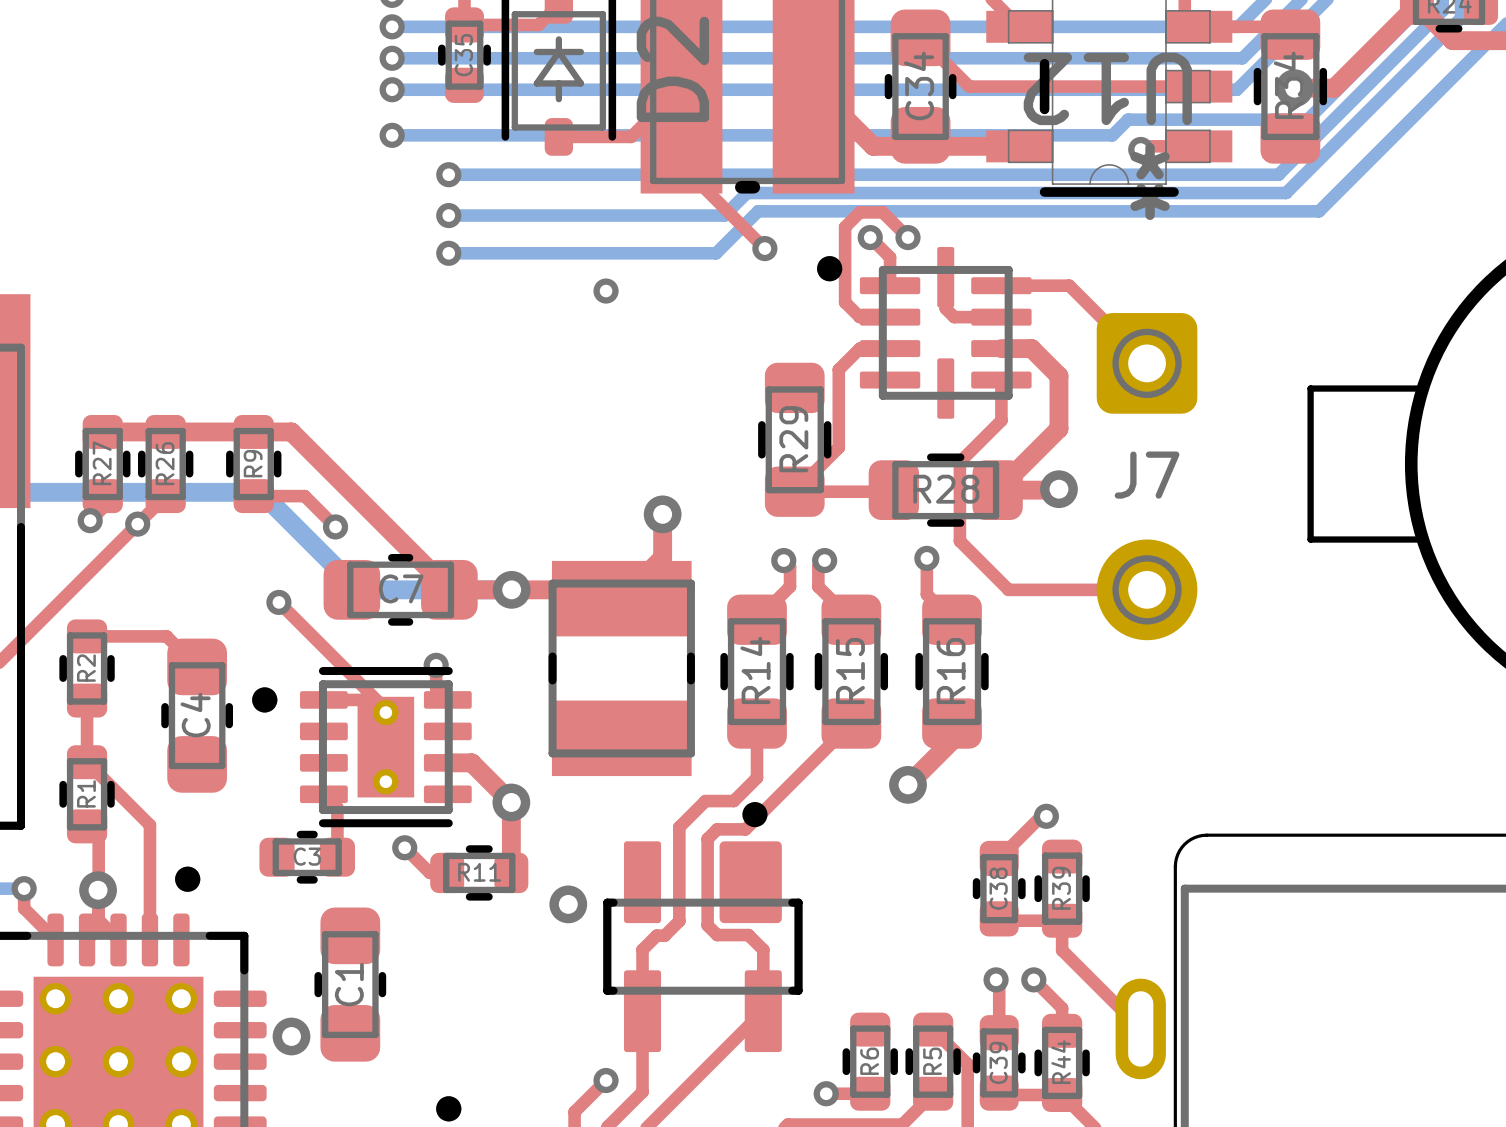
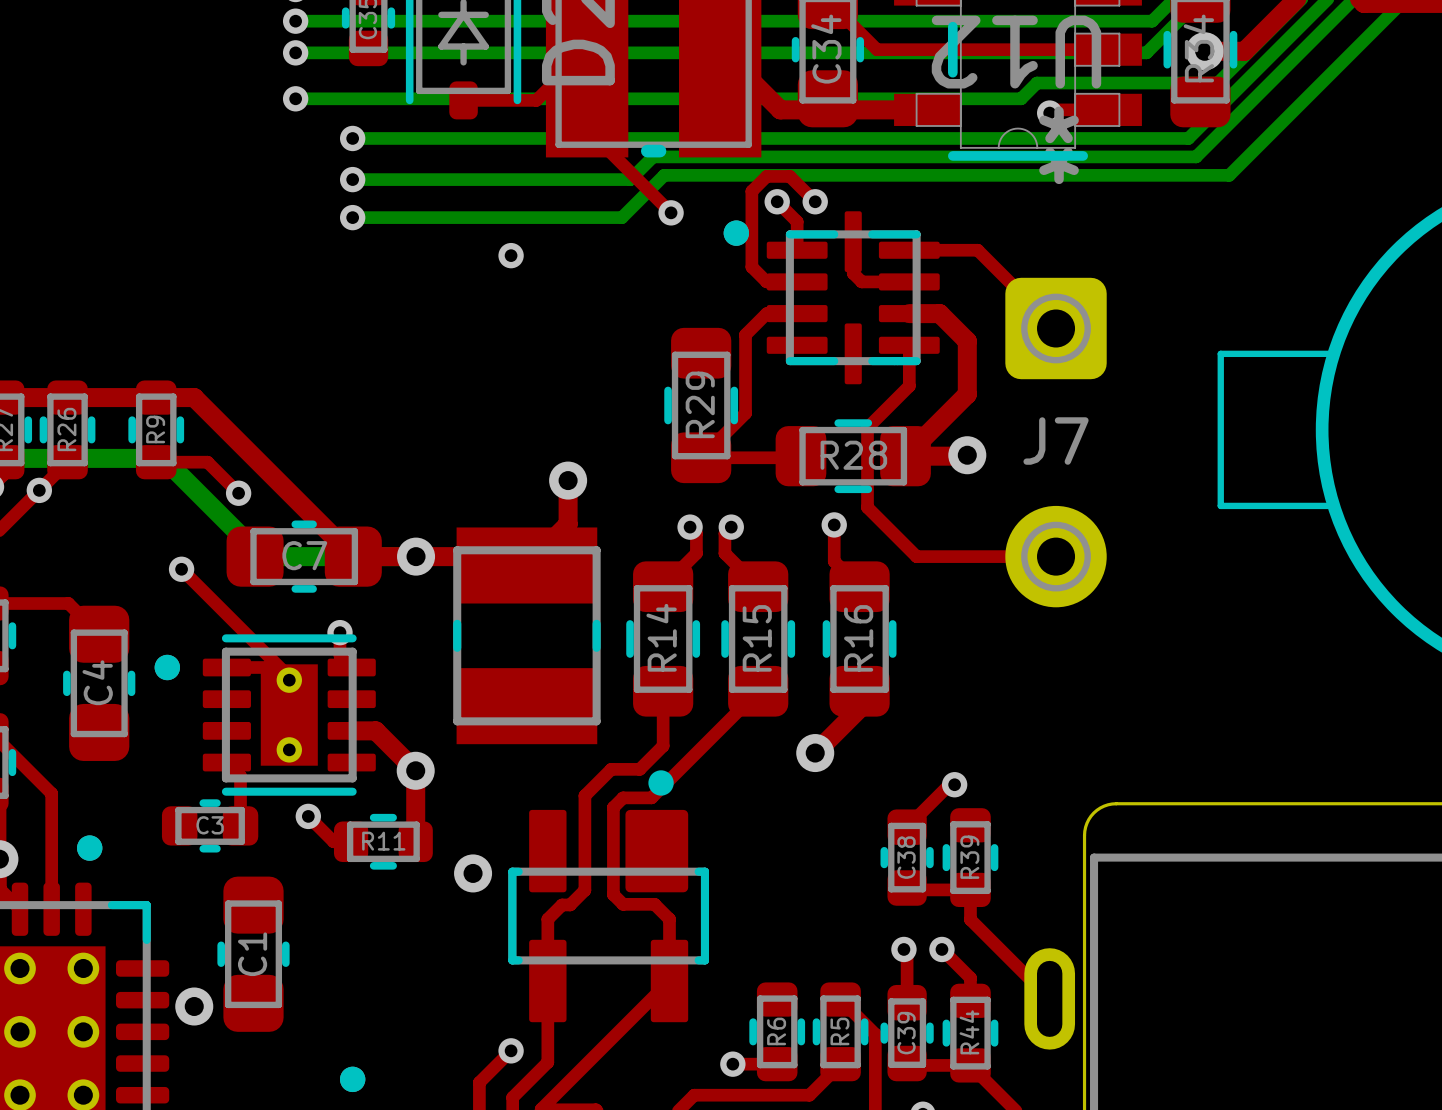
part footprint: [817, 247, 1032, 419] -> [723, 211, 940, 385]

